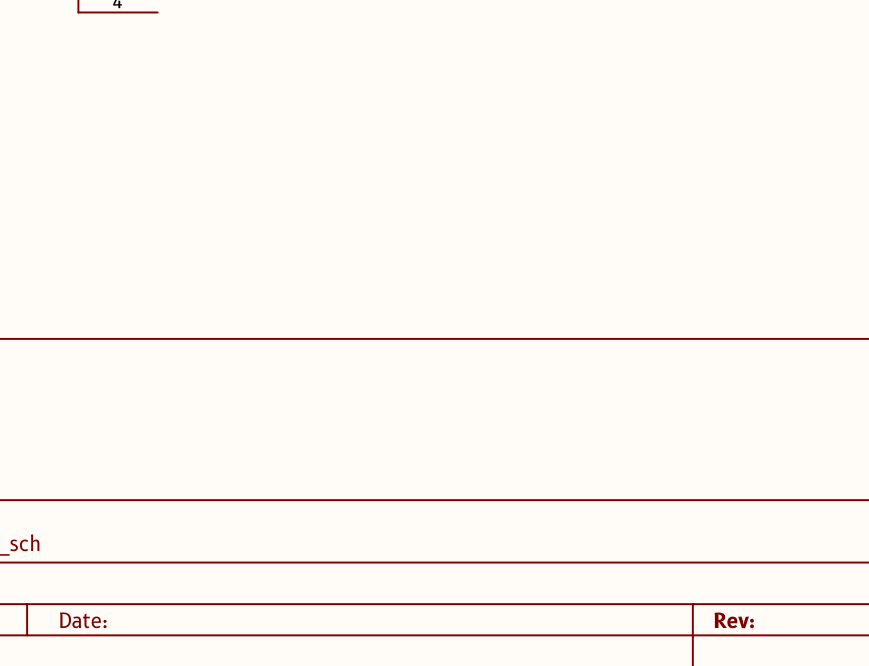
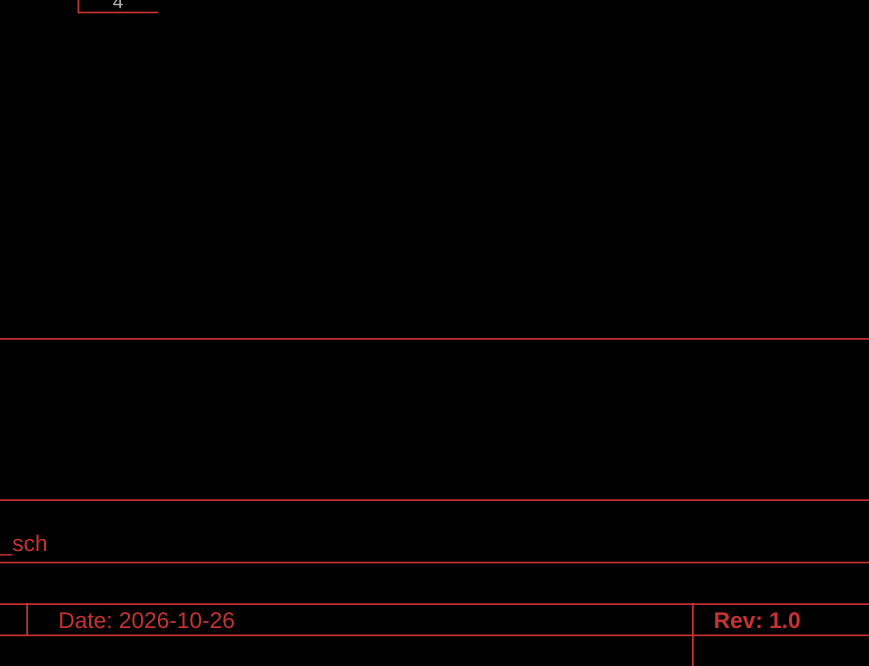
title block: Date: (83, 620) -> Date: 2026-10-26 (147, 620)
title block: Rev: (734, 620) -> Rev: 1.0 (757, 620)

